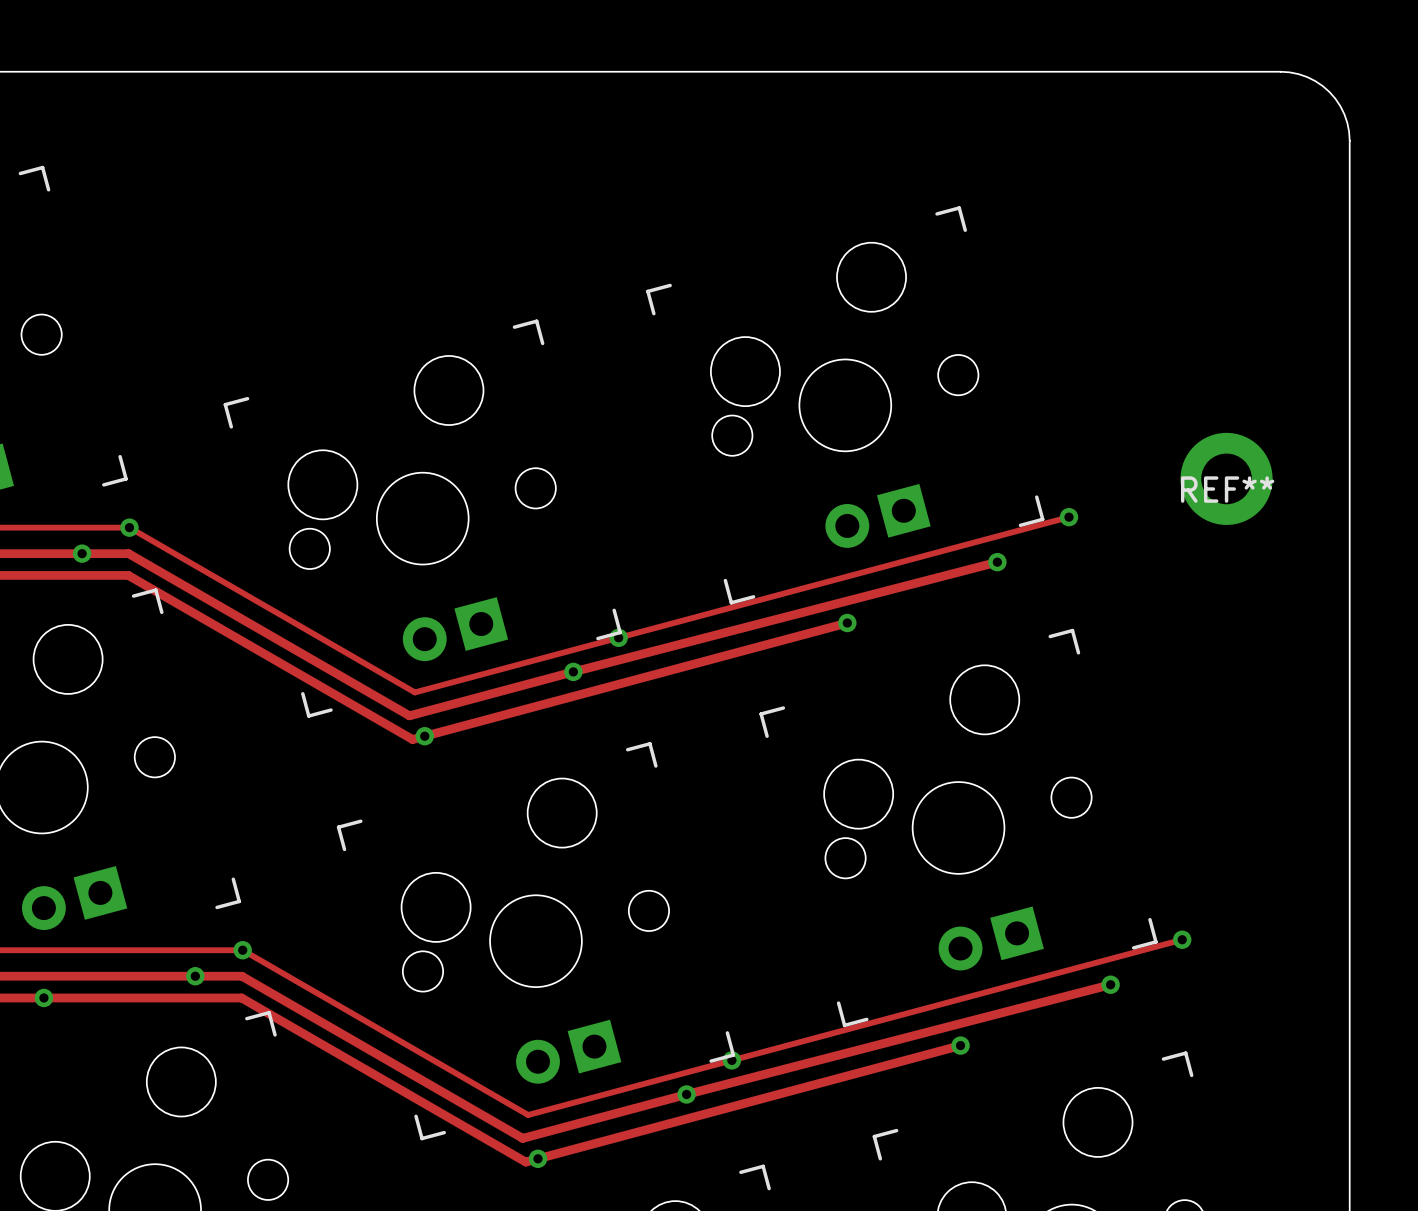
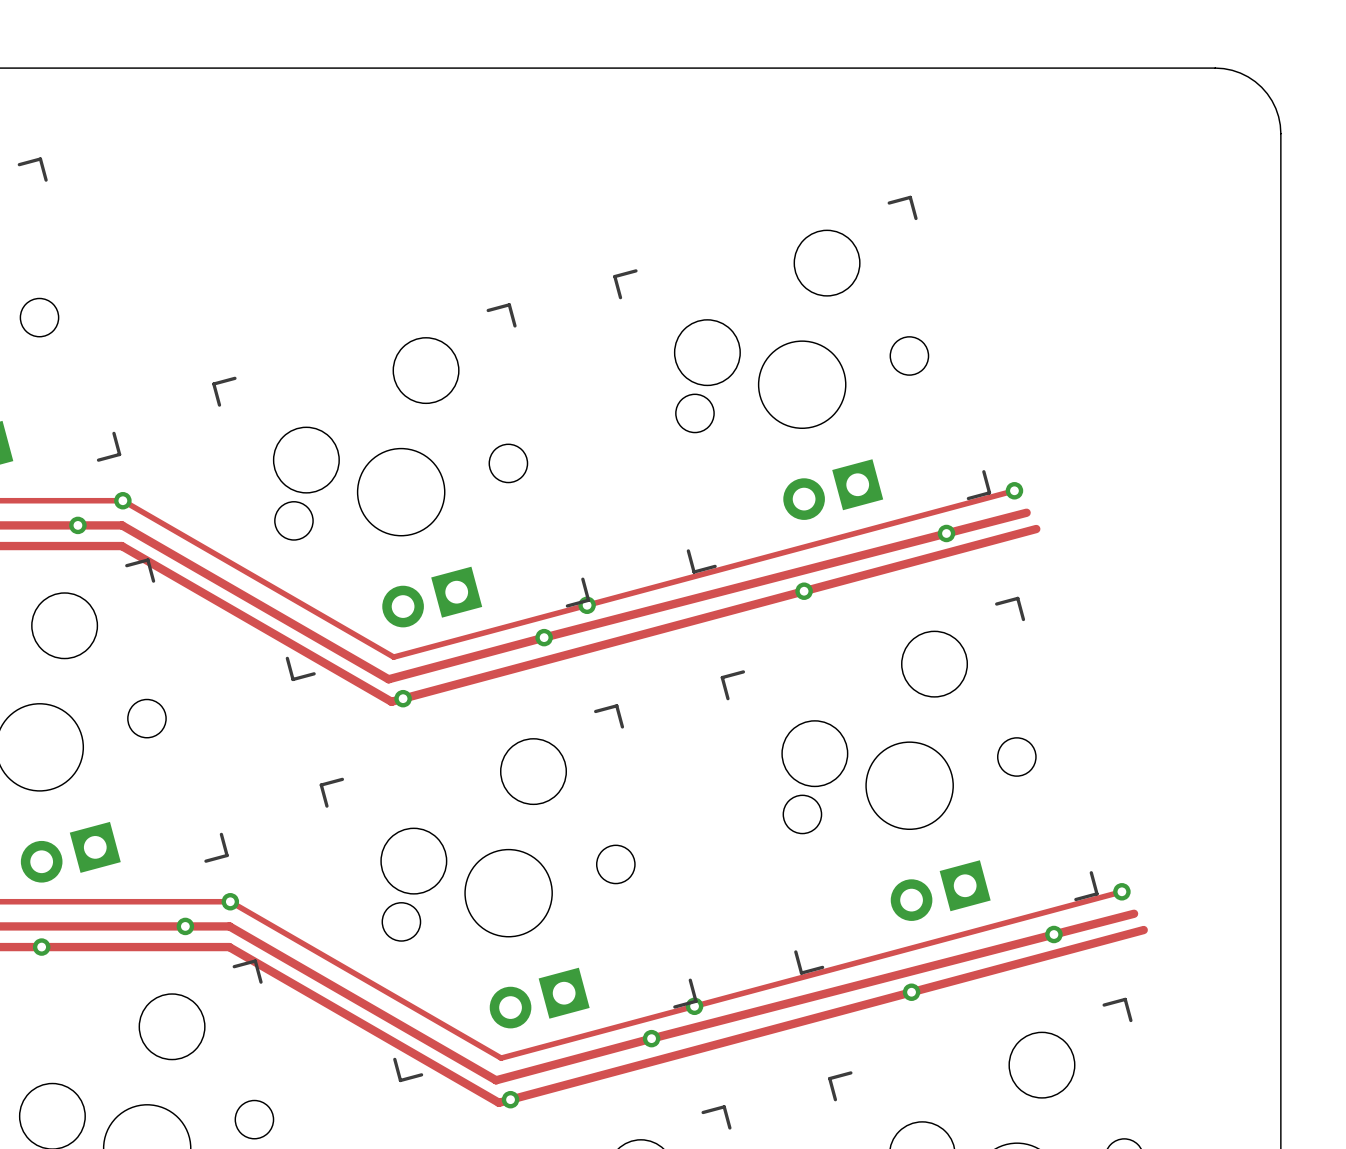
REF**: (1226, 478) -> none
track: none -> (1026, 512) (946, 533)
track: none -> (1036, 529) (804, 591)
track: none -> (1134, 913) (1053, 934)
track: none -> (1143, 930) (911, 992)

